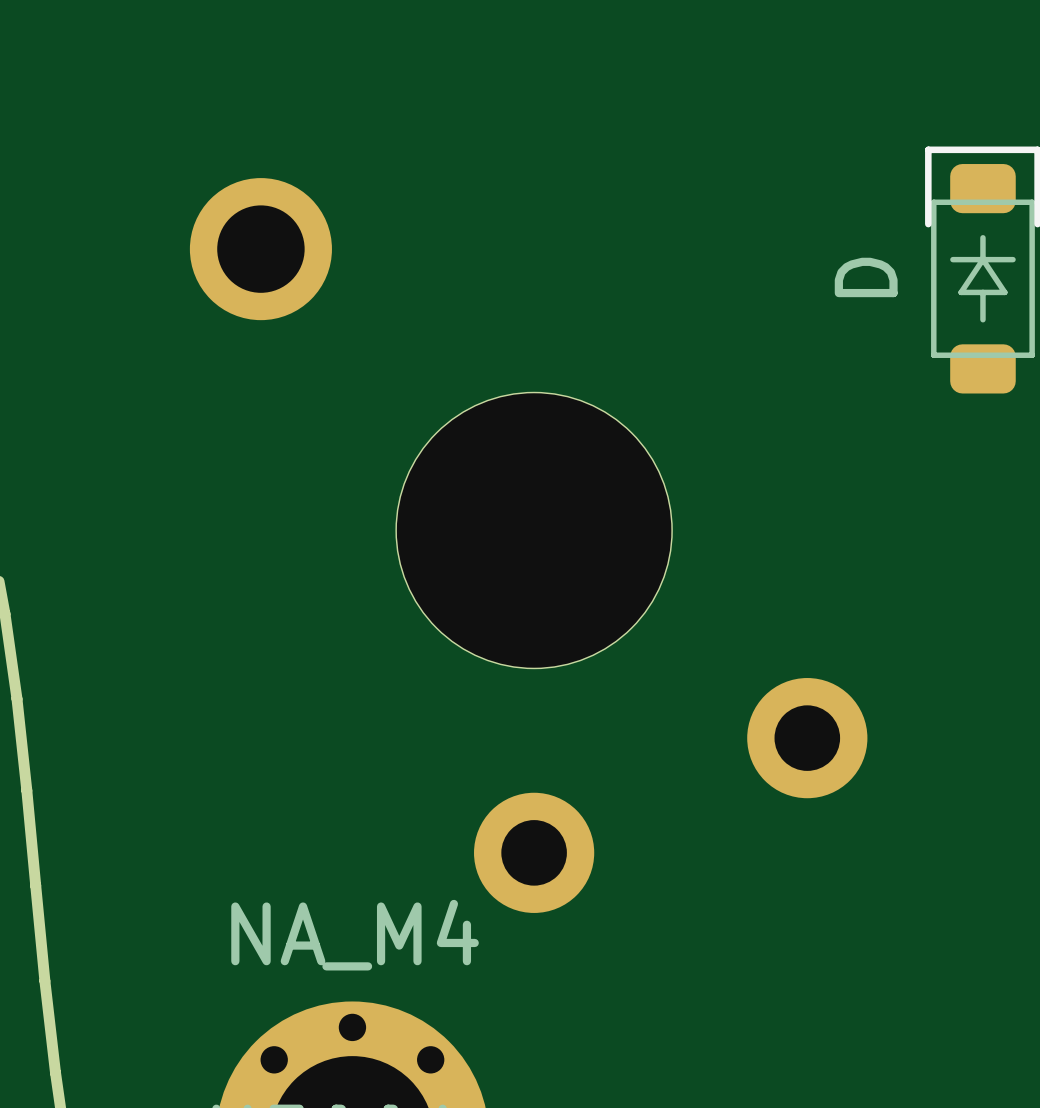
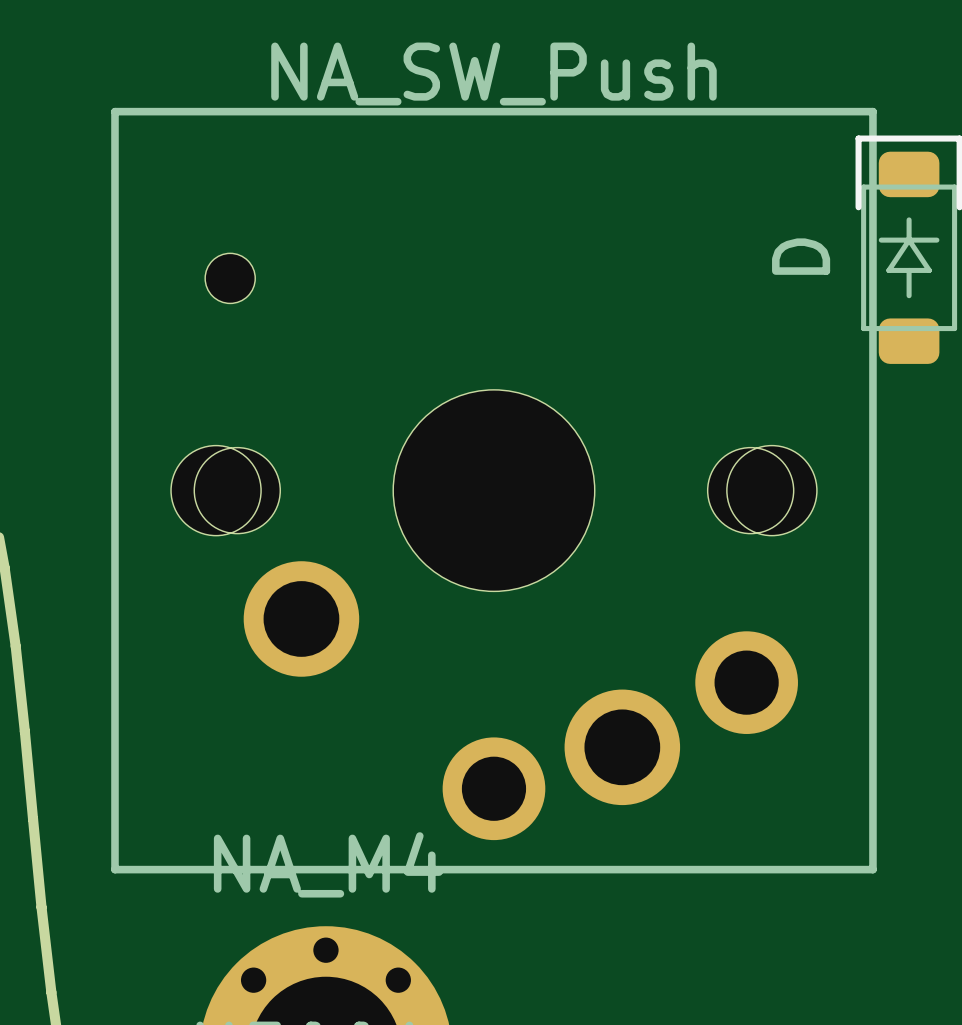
part value: none -> NA_SW_Push (493, 74)
part footprint: [189, 178, 868, 913] -> [111, 107, 877, 874]

